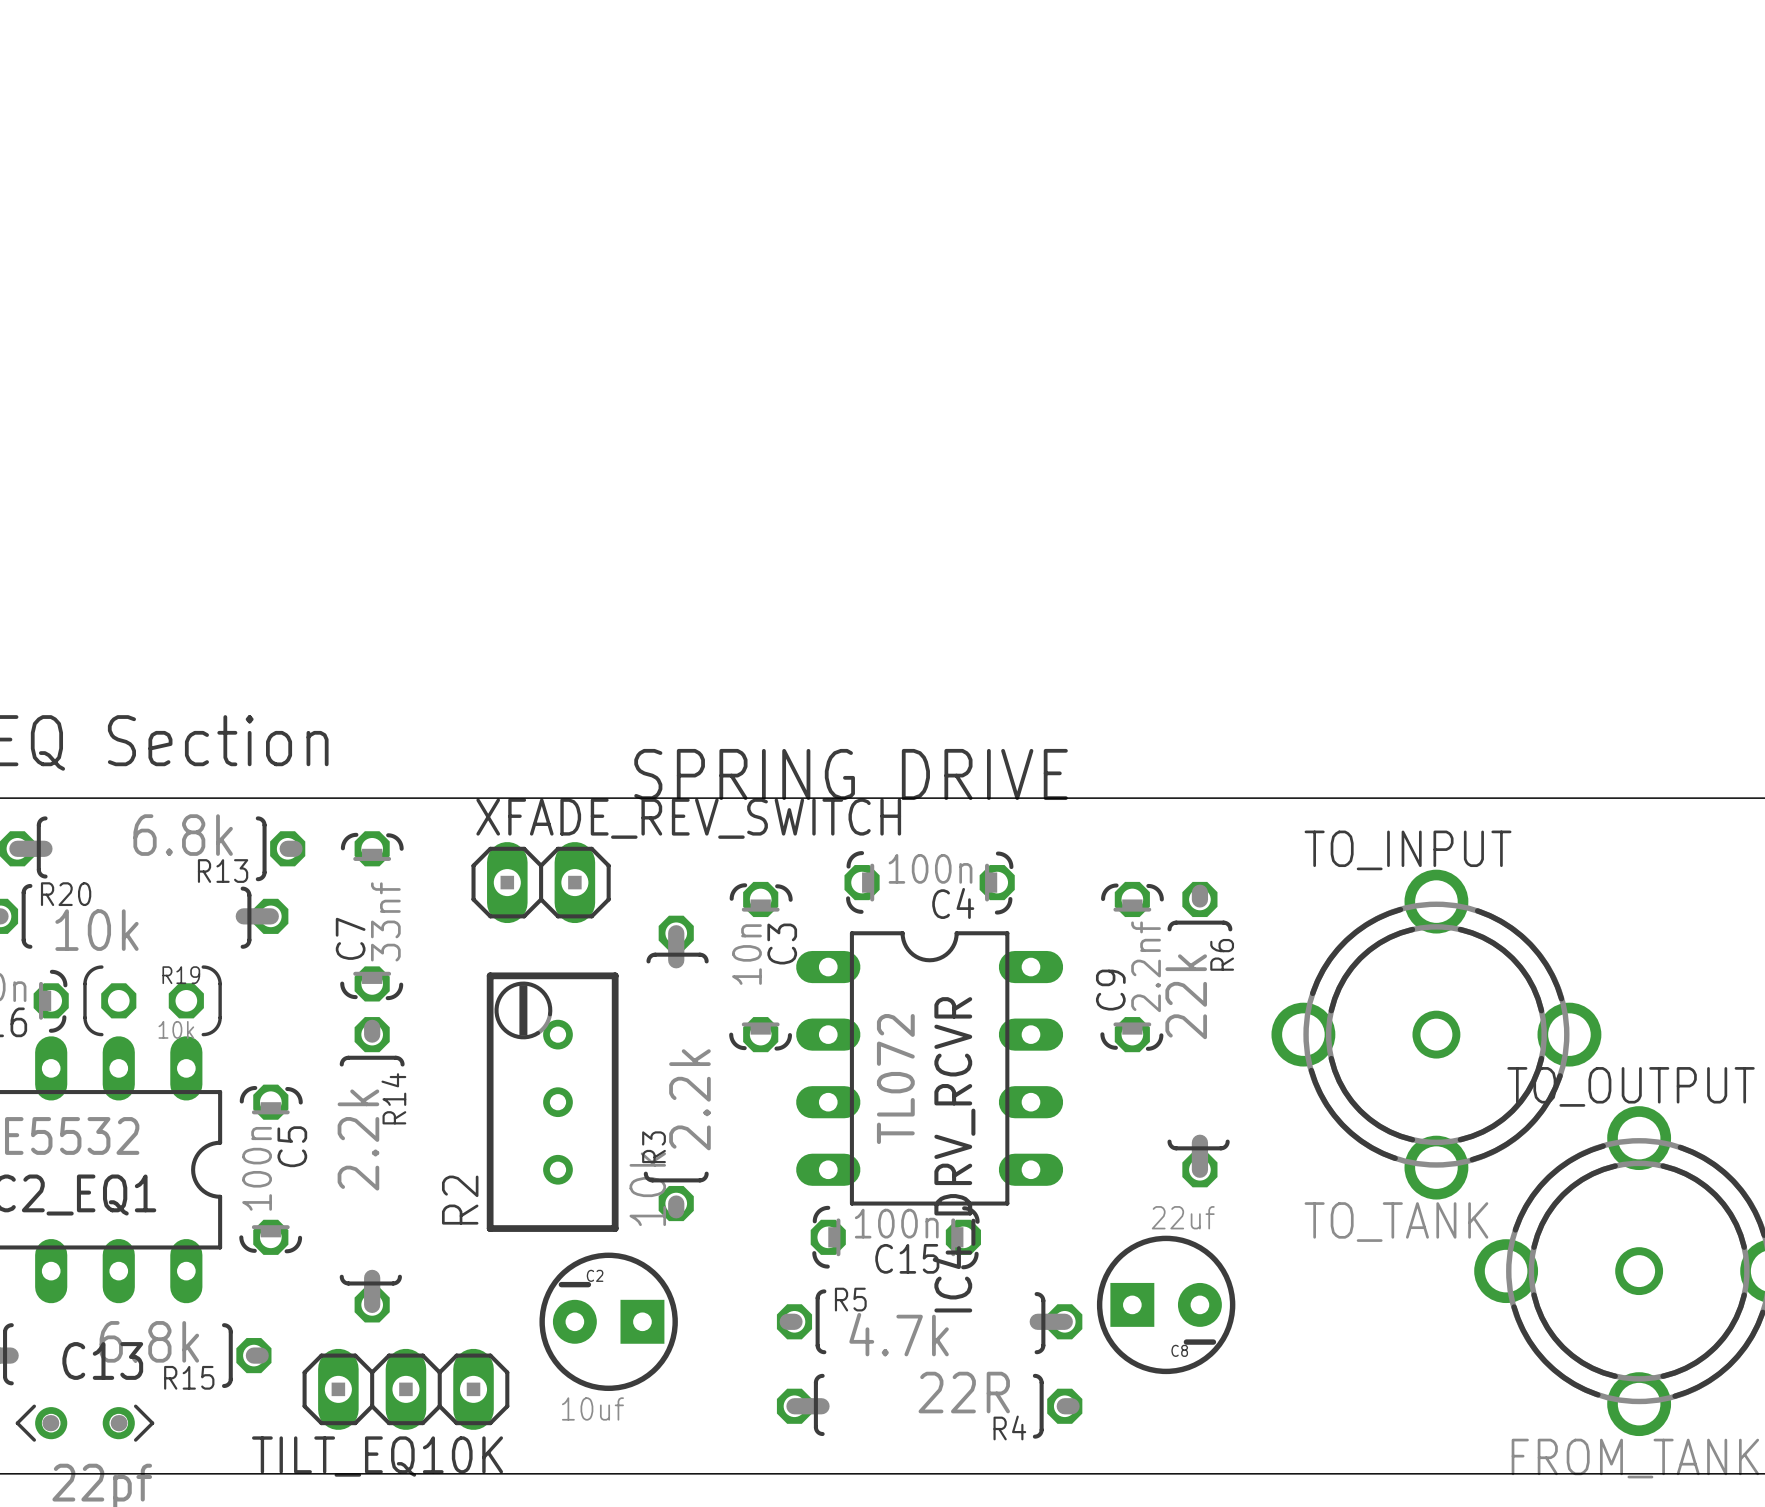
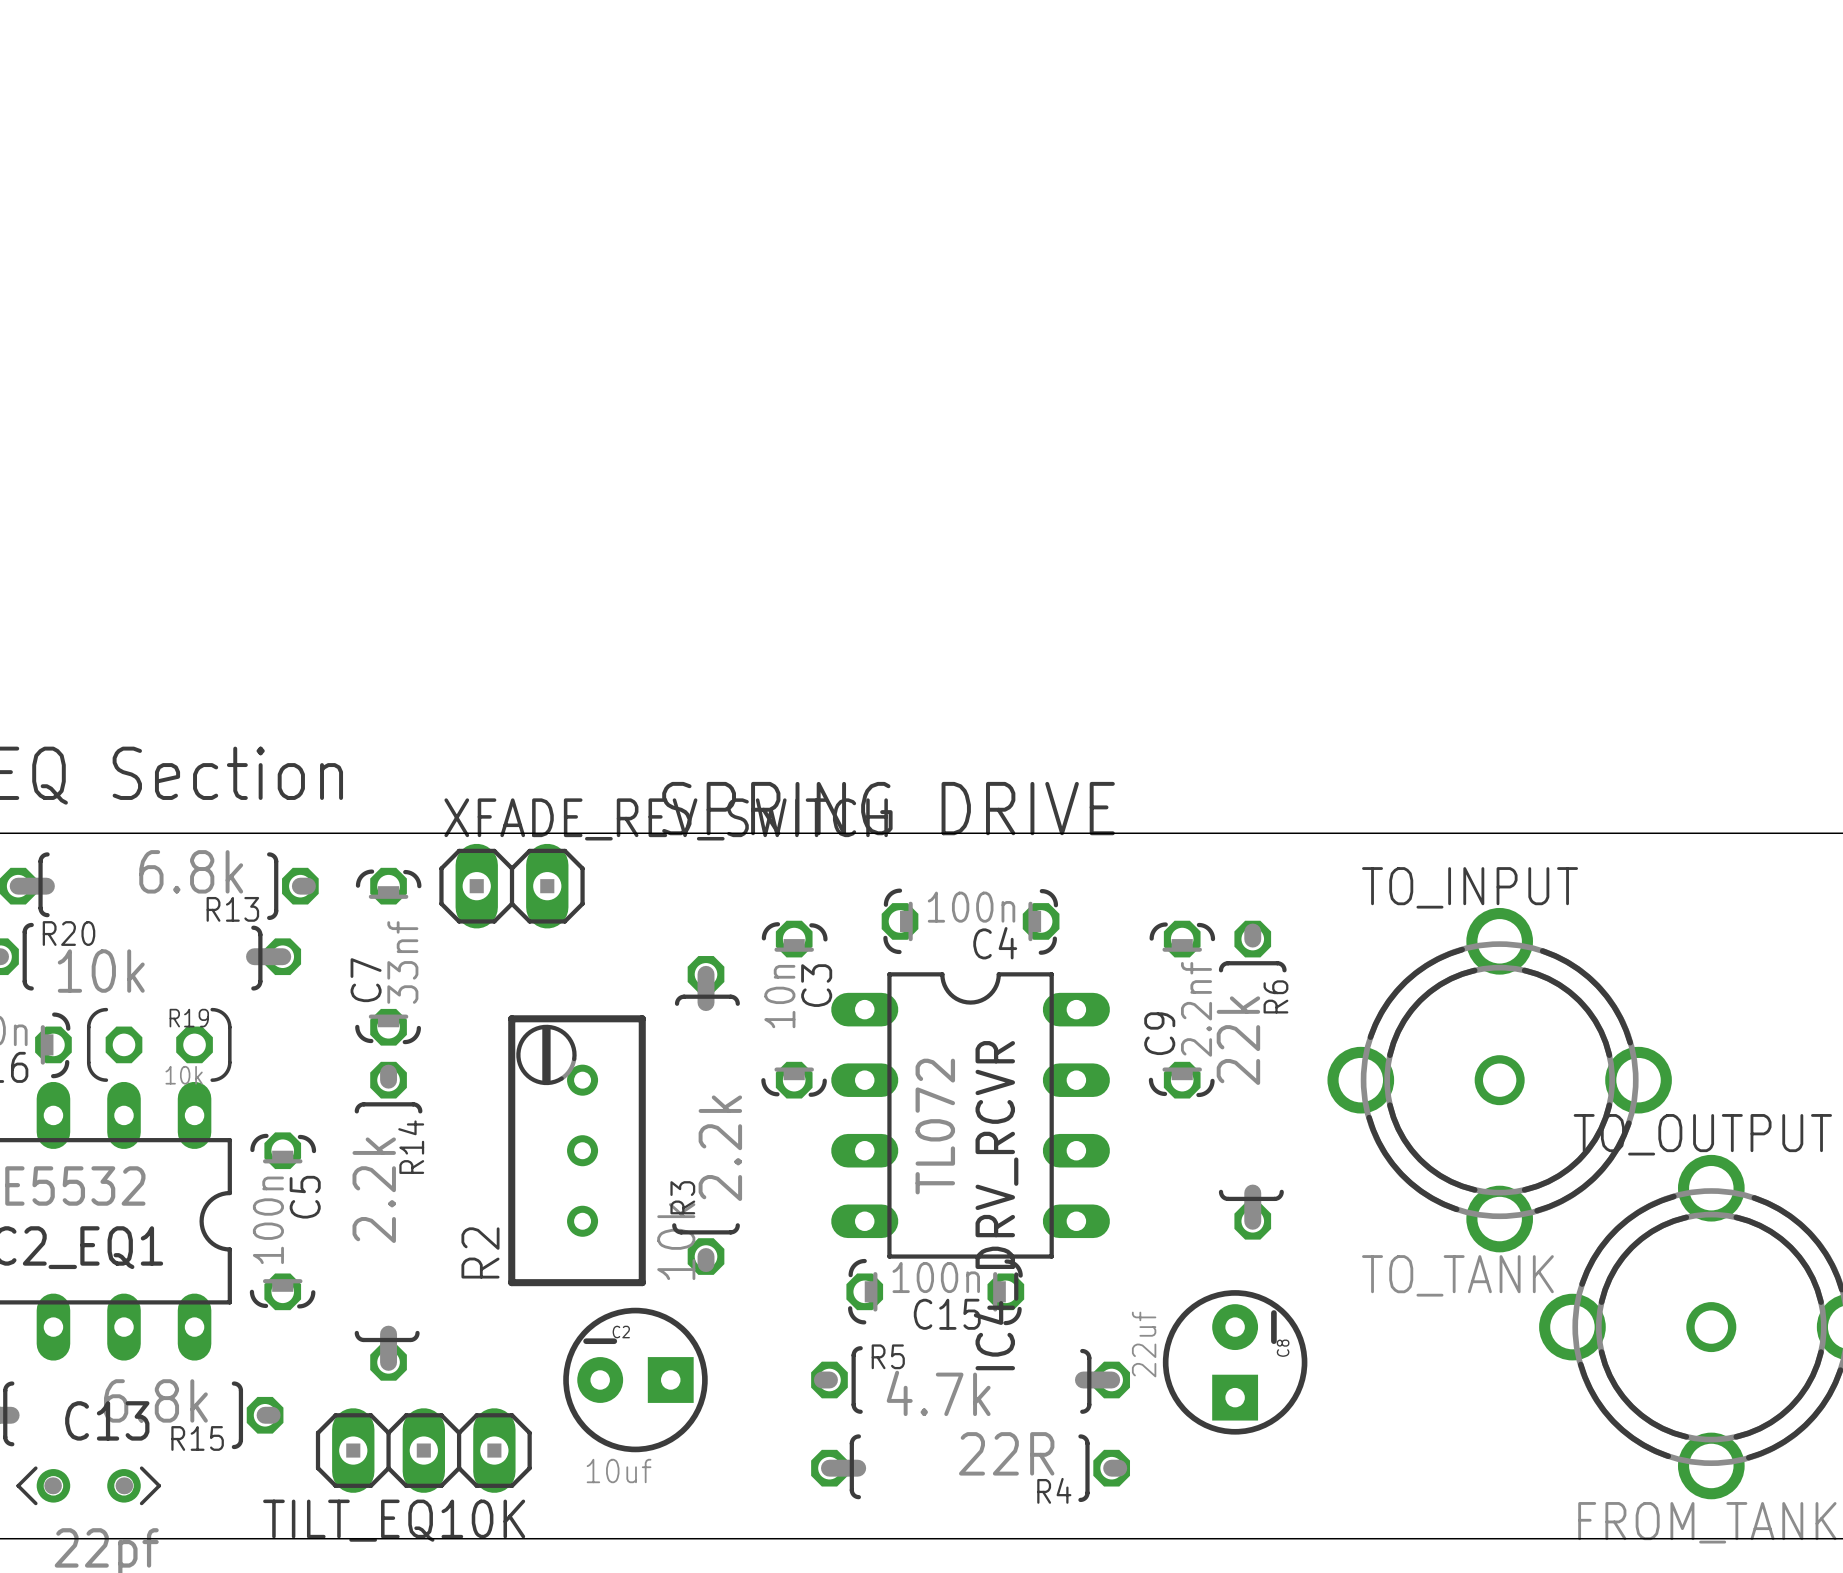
XFADE_REV_SWITCH position: (541, 882) -> (512, 886)
C8 rotation: 0° (1166, 1304) -> 90° counterclockwise (1235, 1362)

